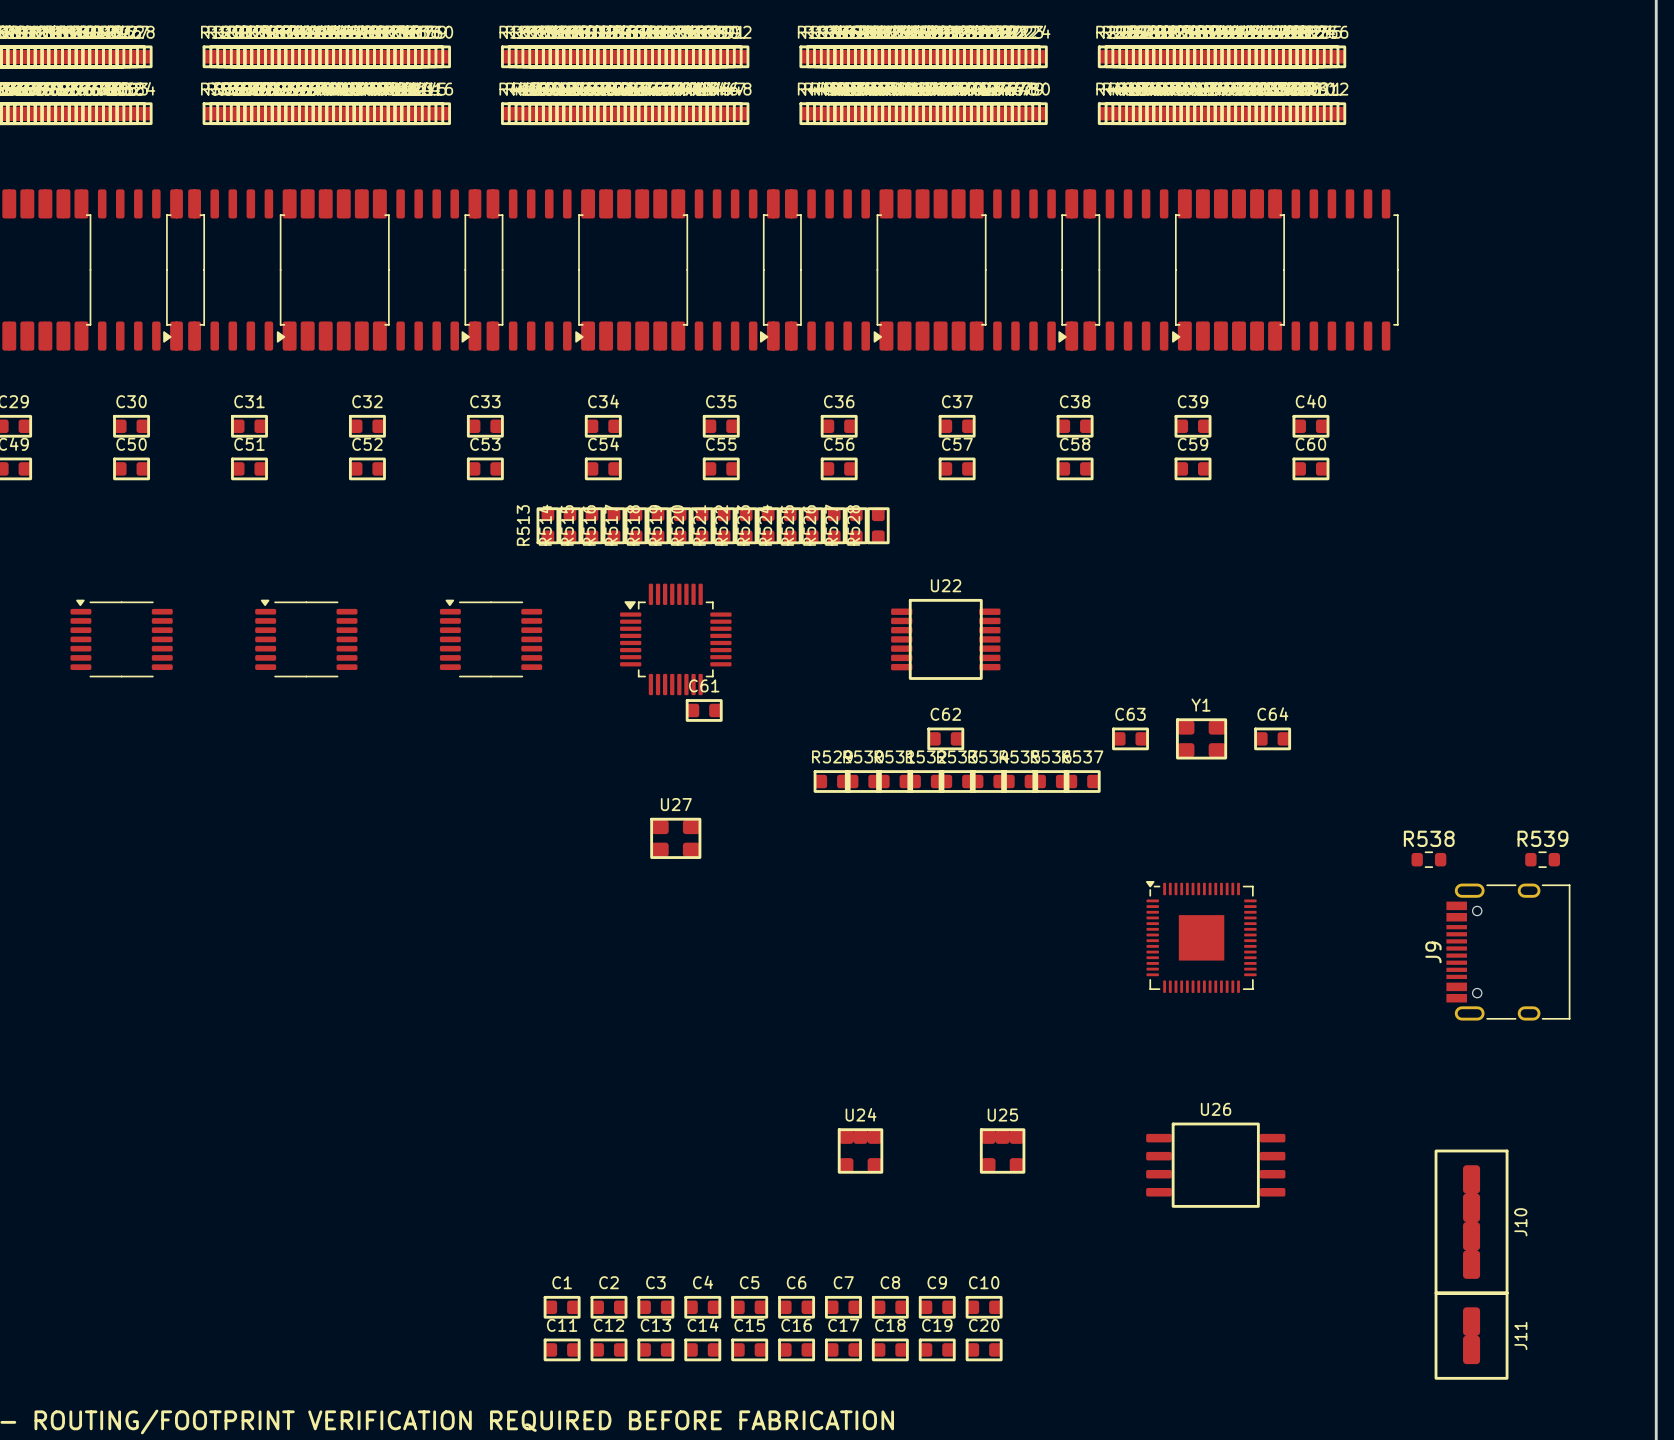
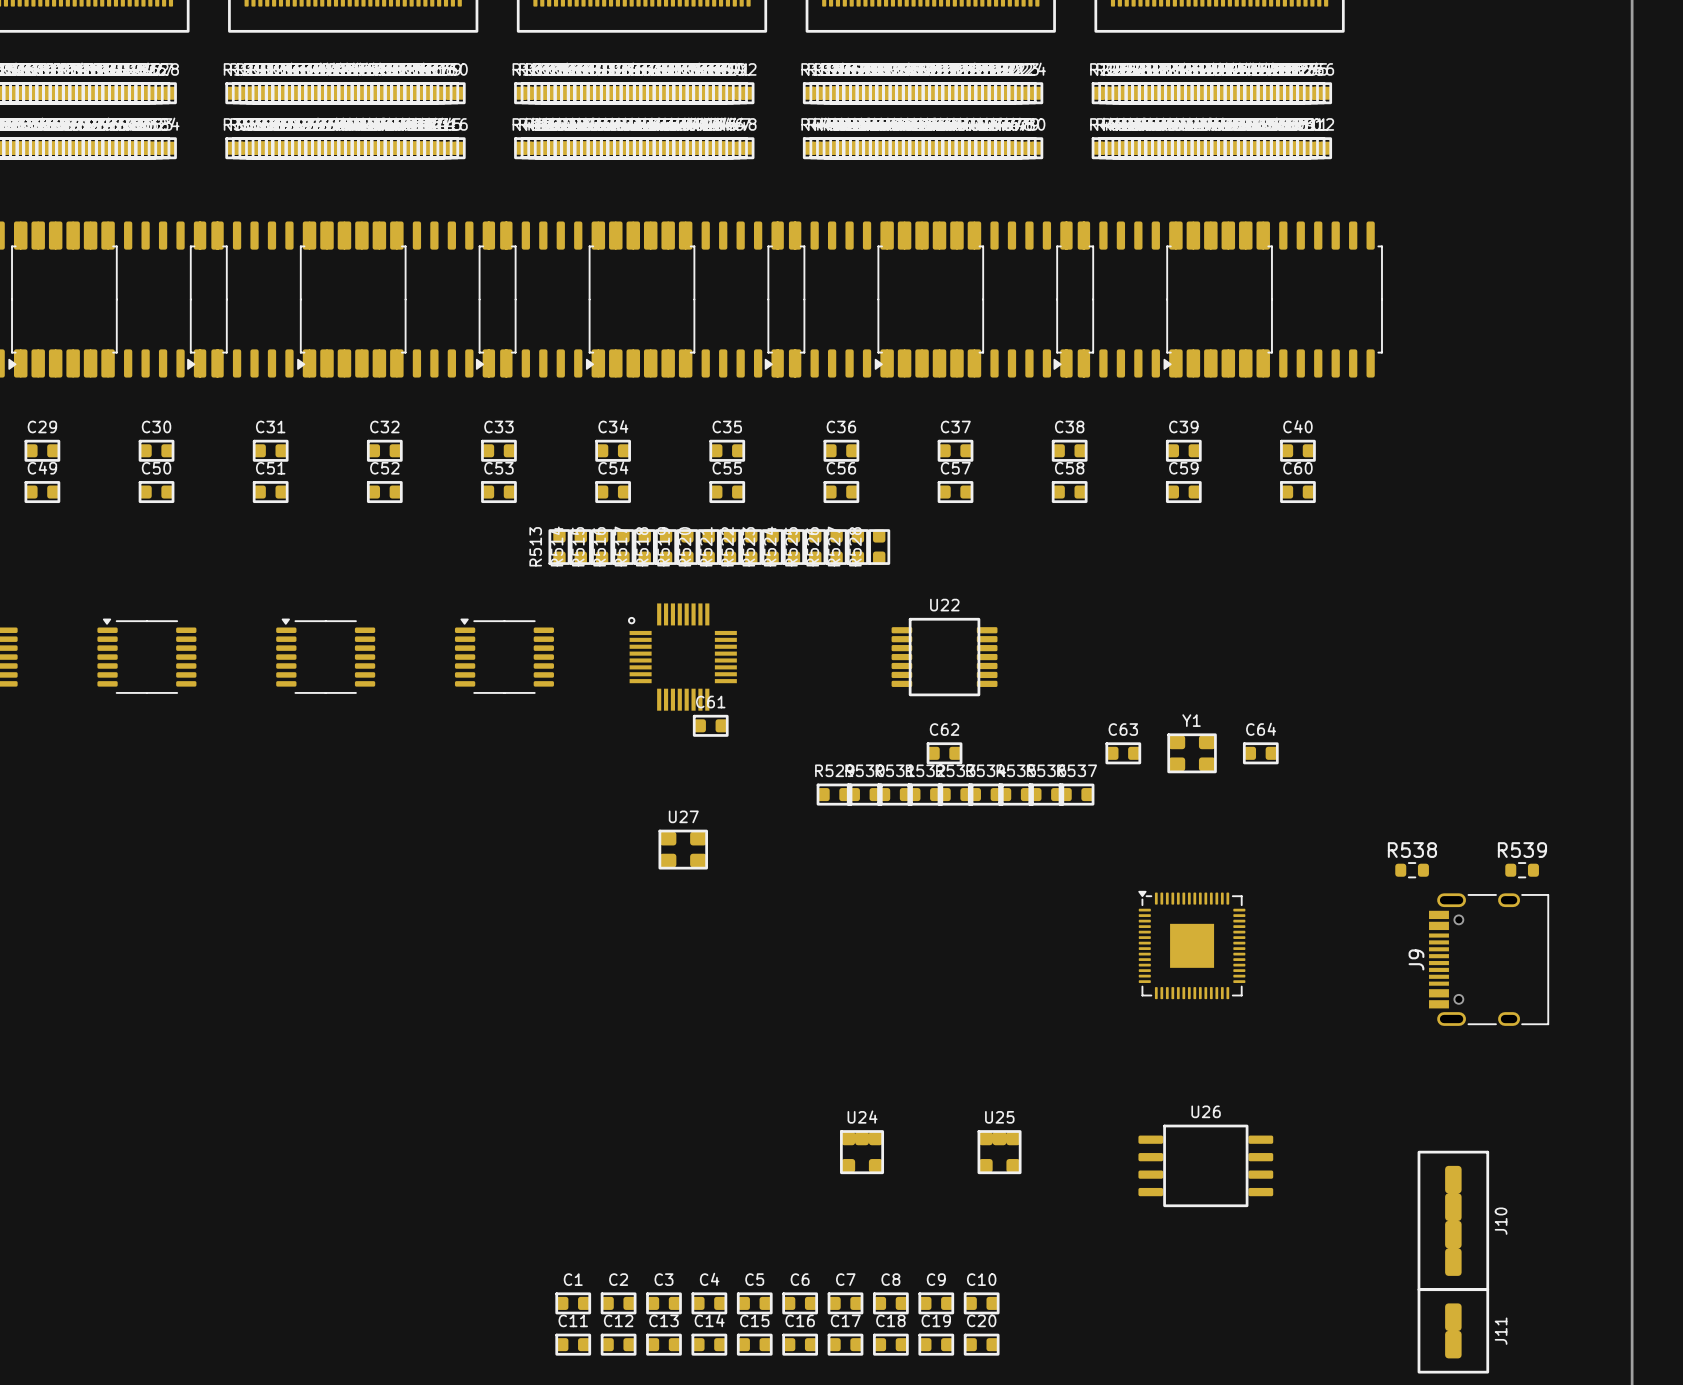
part footprint: [620, 583, 732, 696] -> [628, 603, 737, 711]

